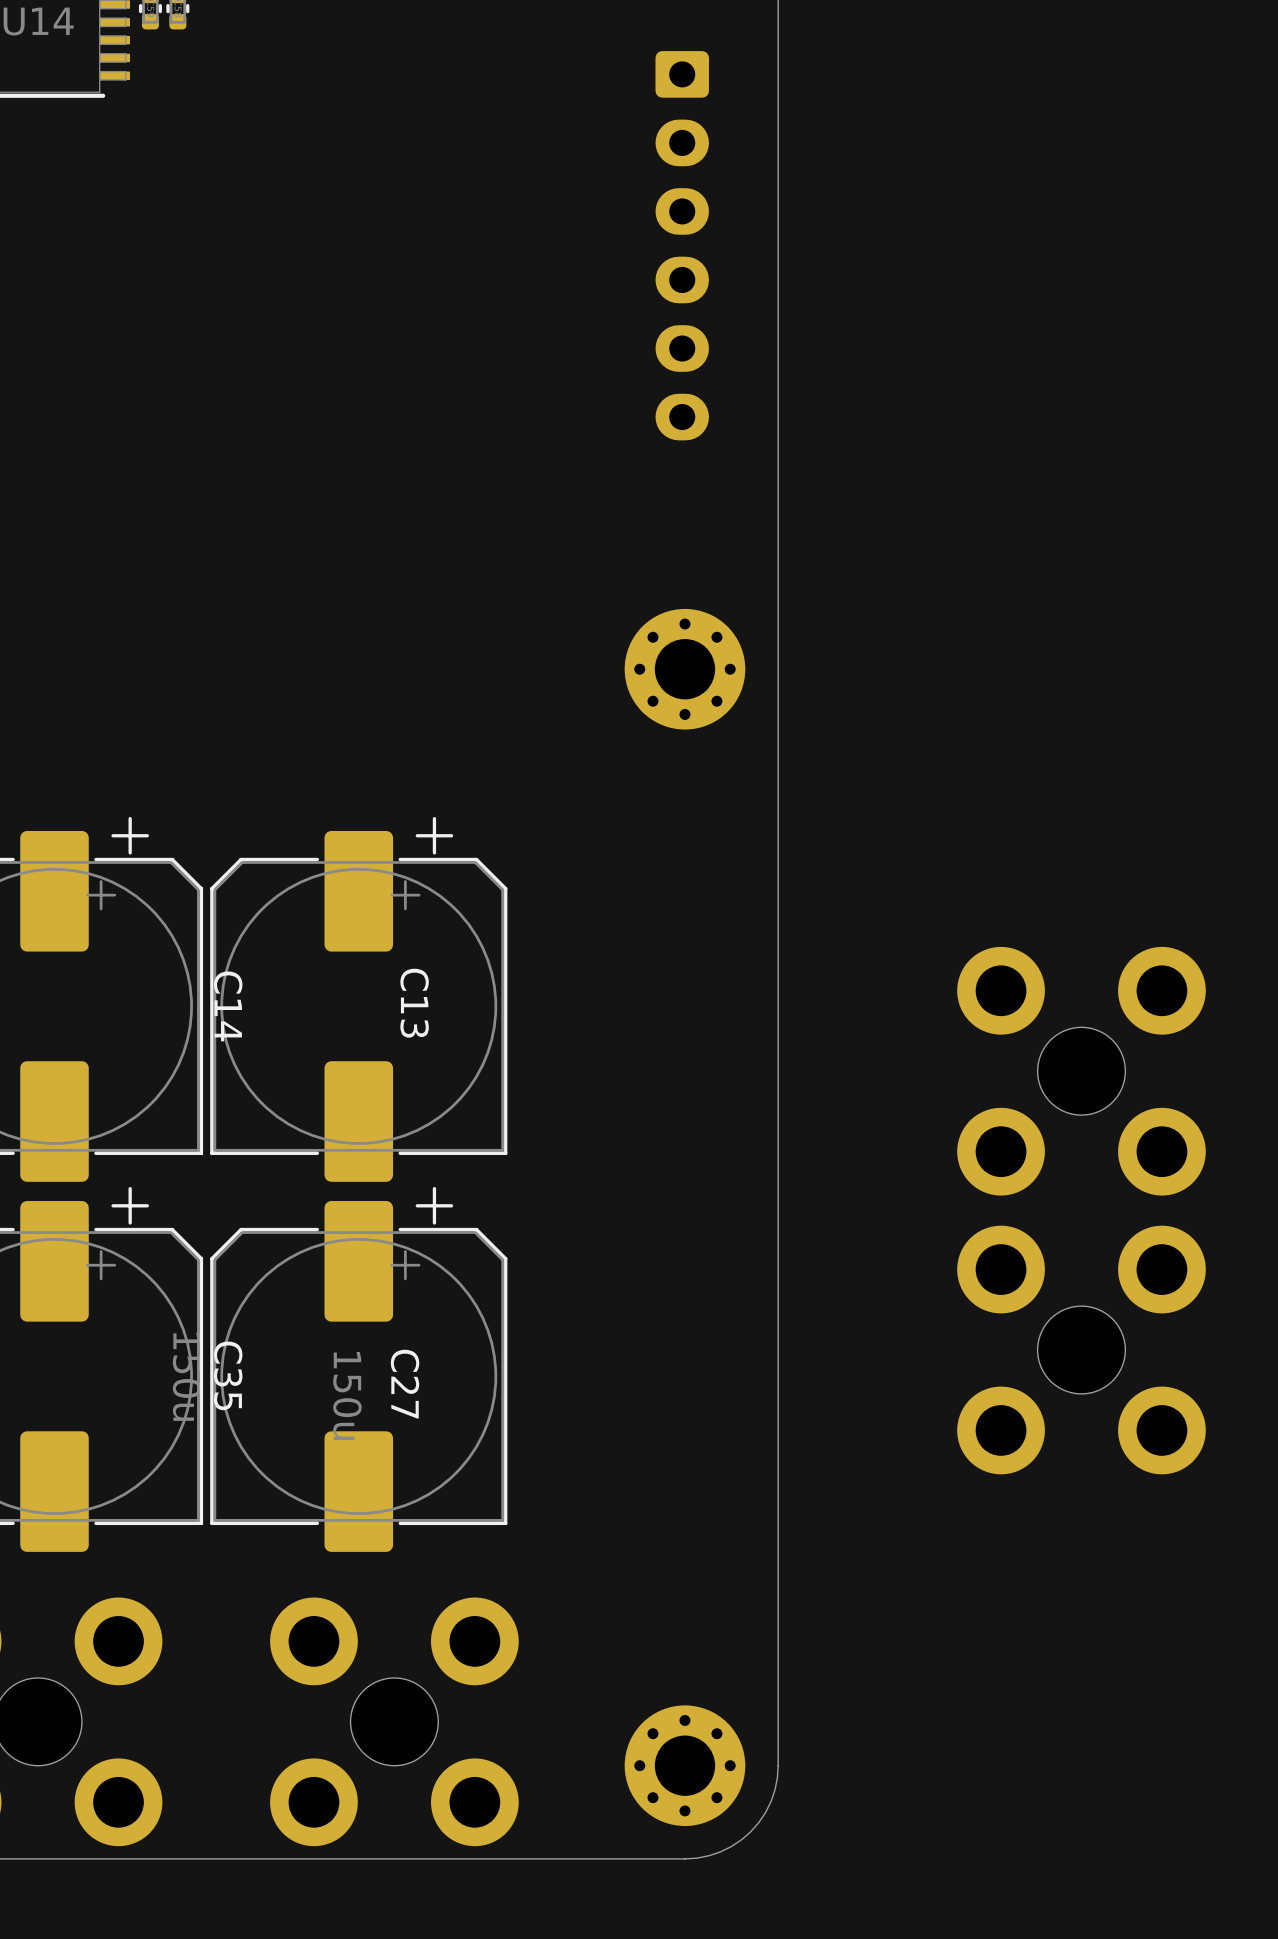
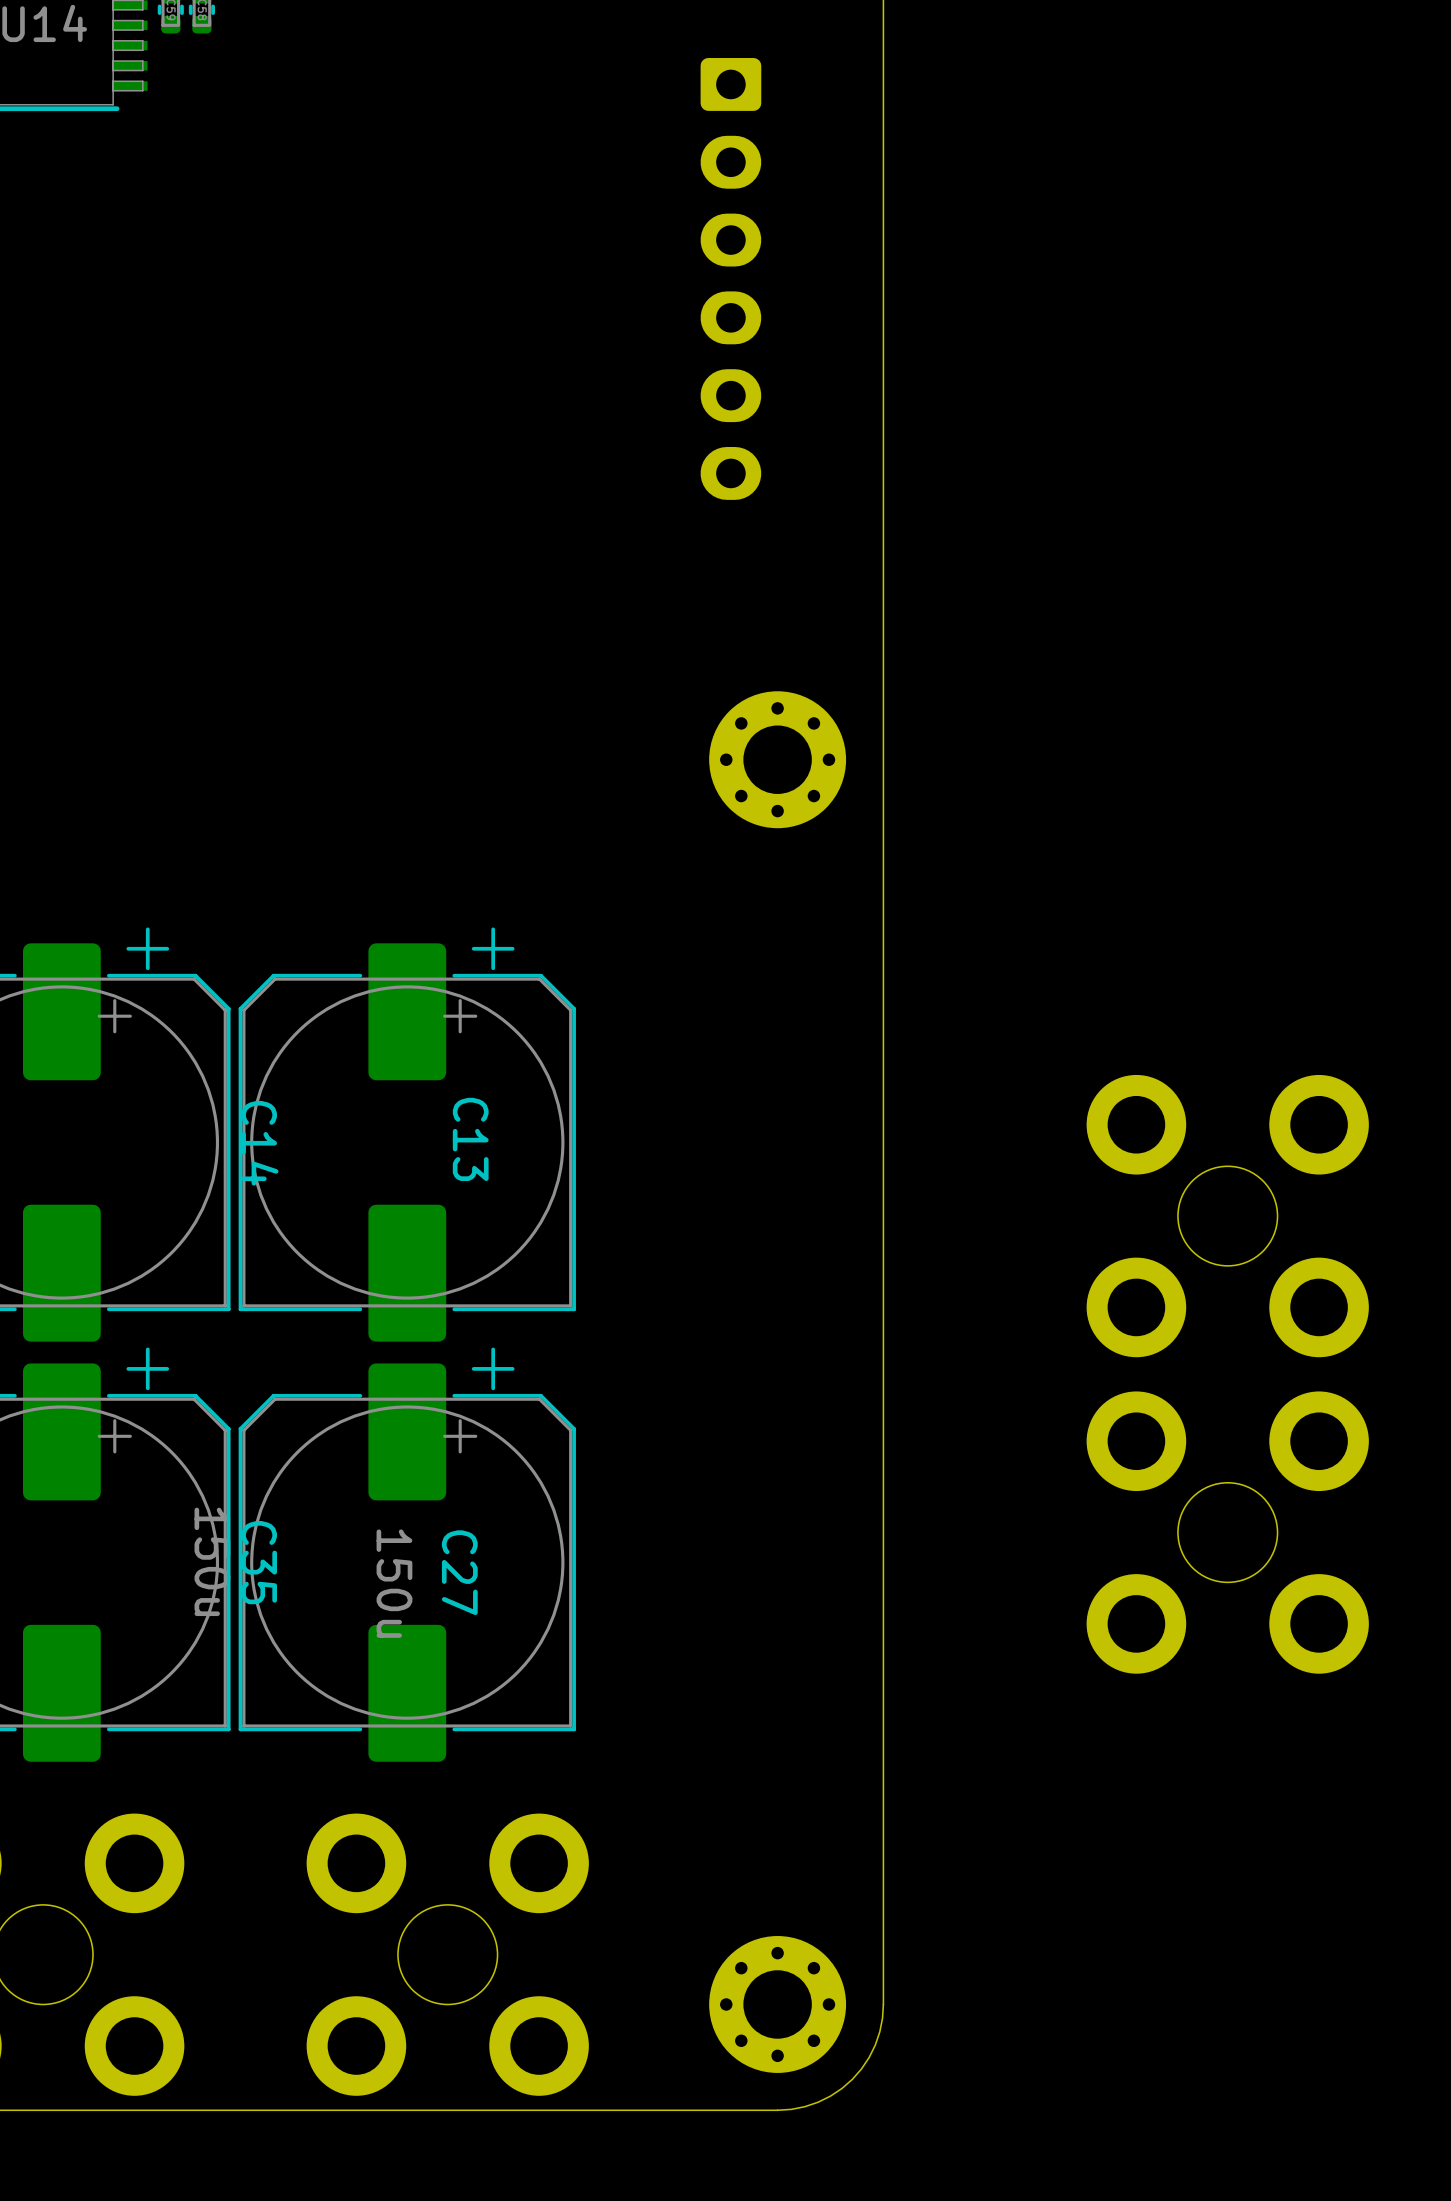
part position: (682, 245) -> (730, 278)

